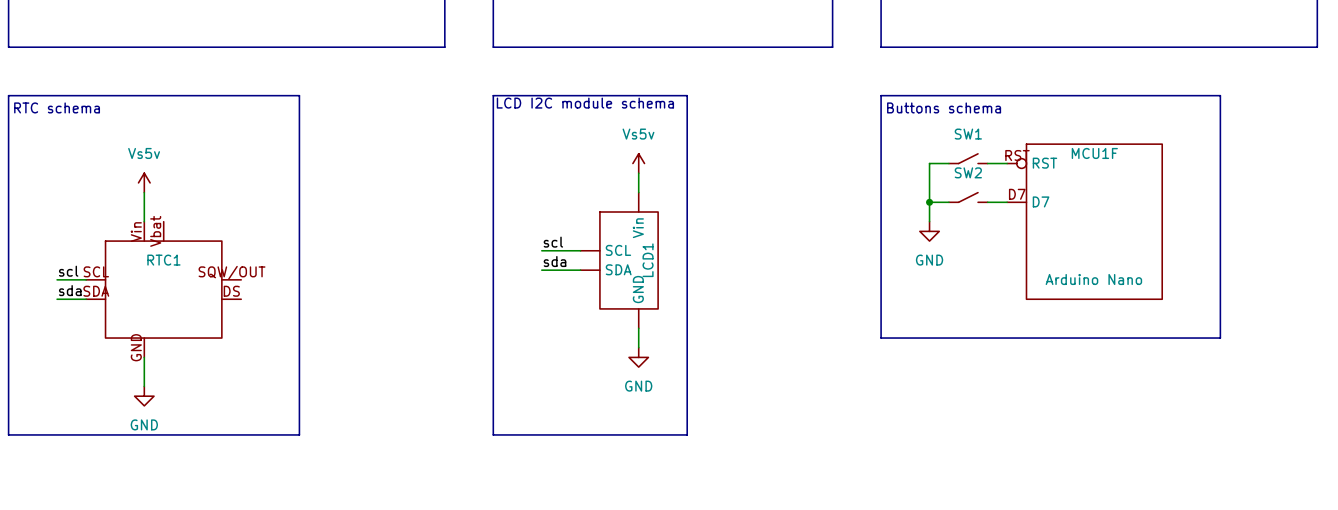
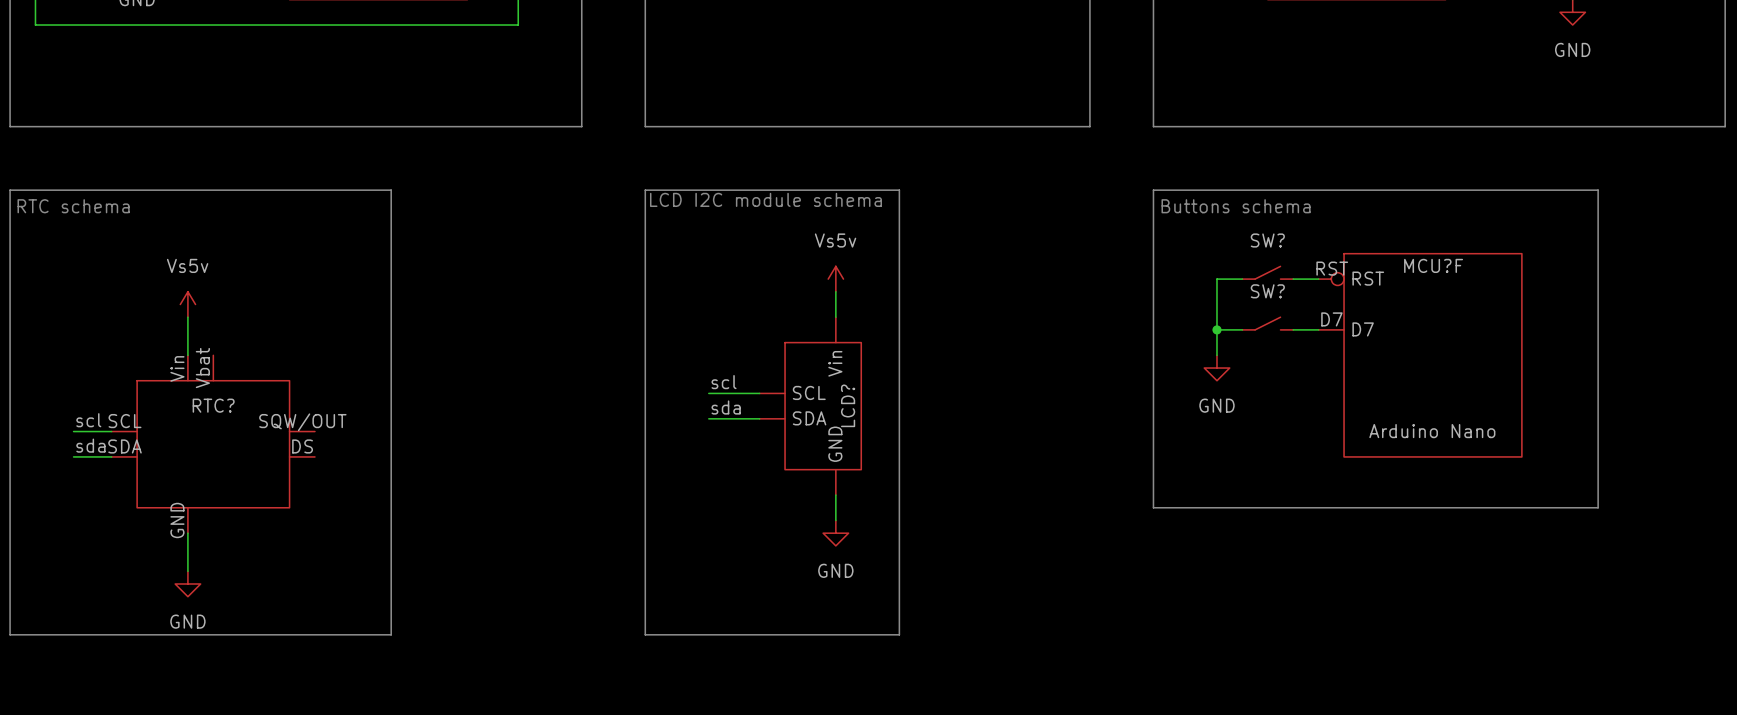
SW1 name: SW1 (968, 134) -> SW? (1267, 240)
MCU1F name: MCU1F (1094, 153) -> MCU?F (1433, 265)
SW2 name: SW2 (968, 172) -> SW? (1267, 291)
RTC1 name: RTC1 (163, 260) -> RTC? (213, 405)
LCD1 name: LCD1 (648, 260) -> LCD? (848, 405)

